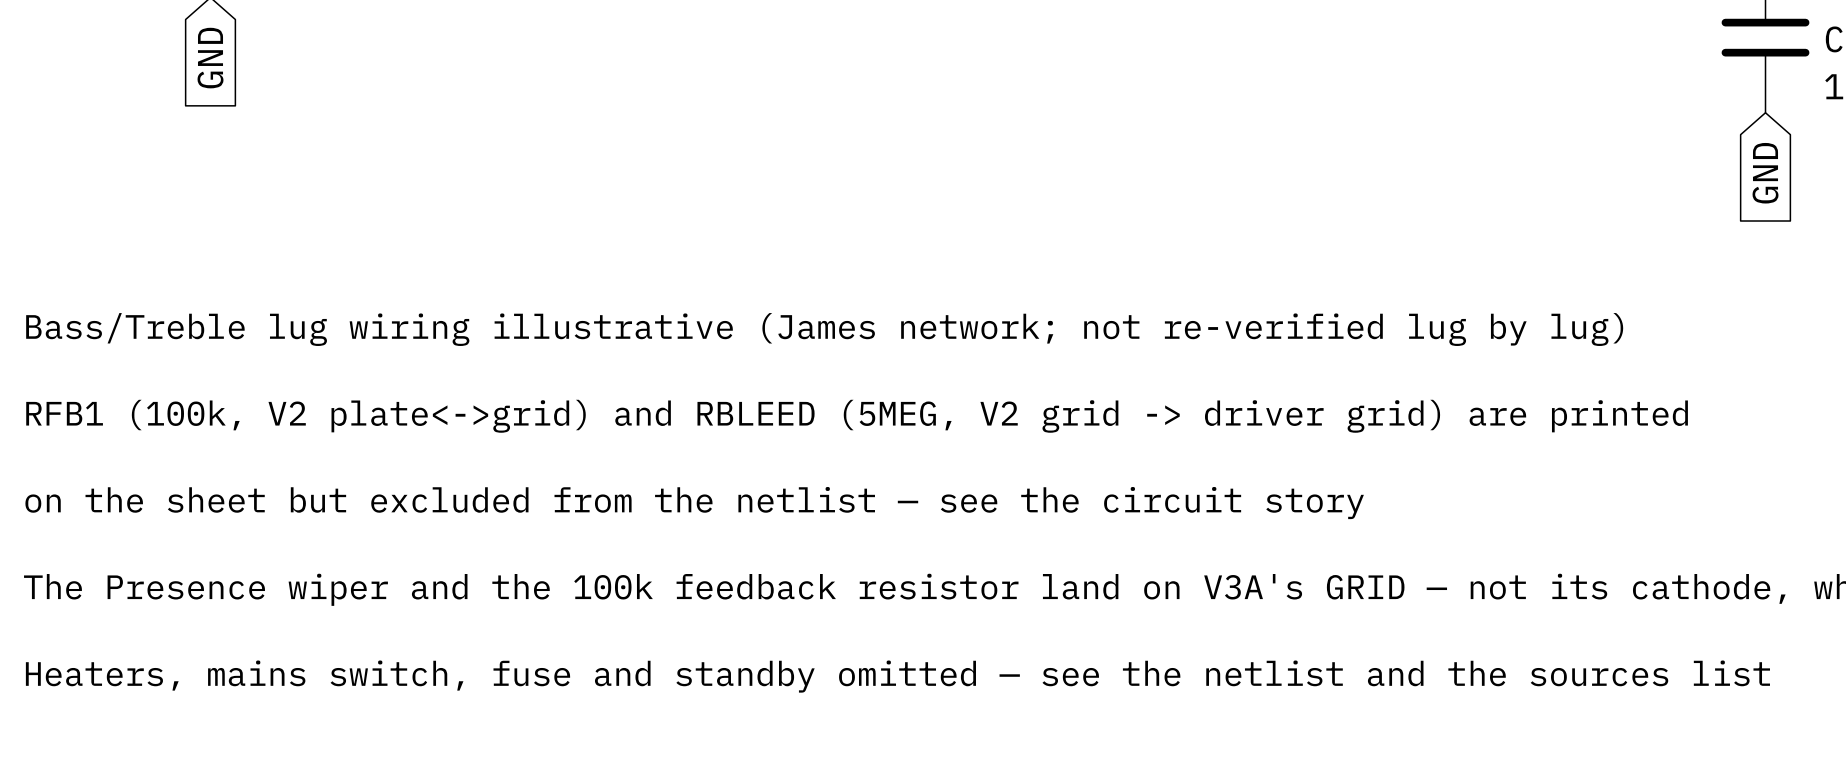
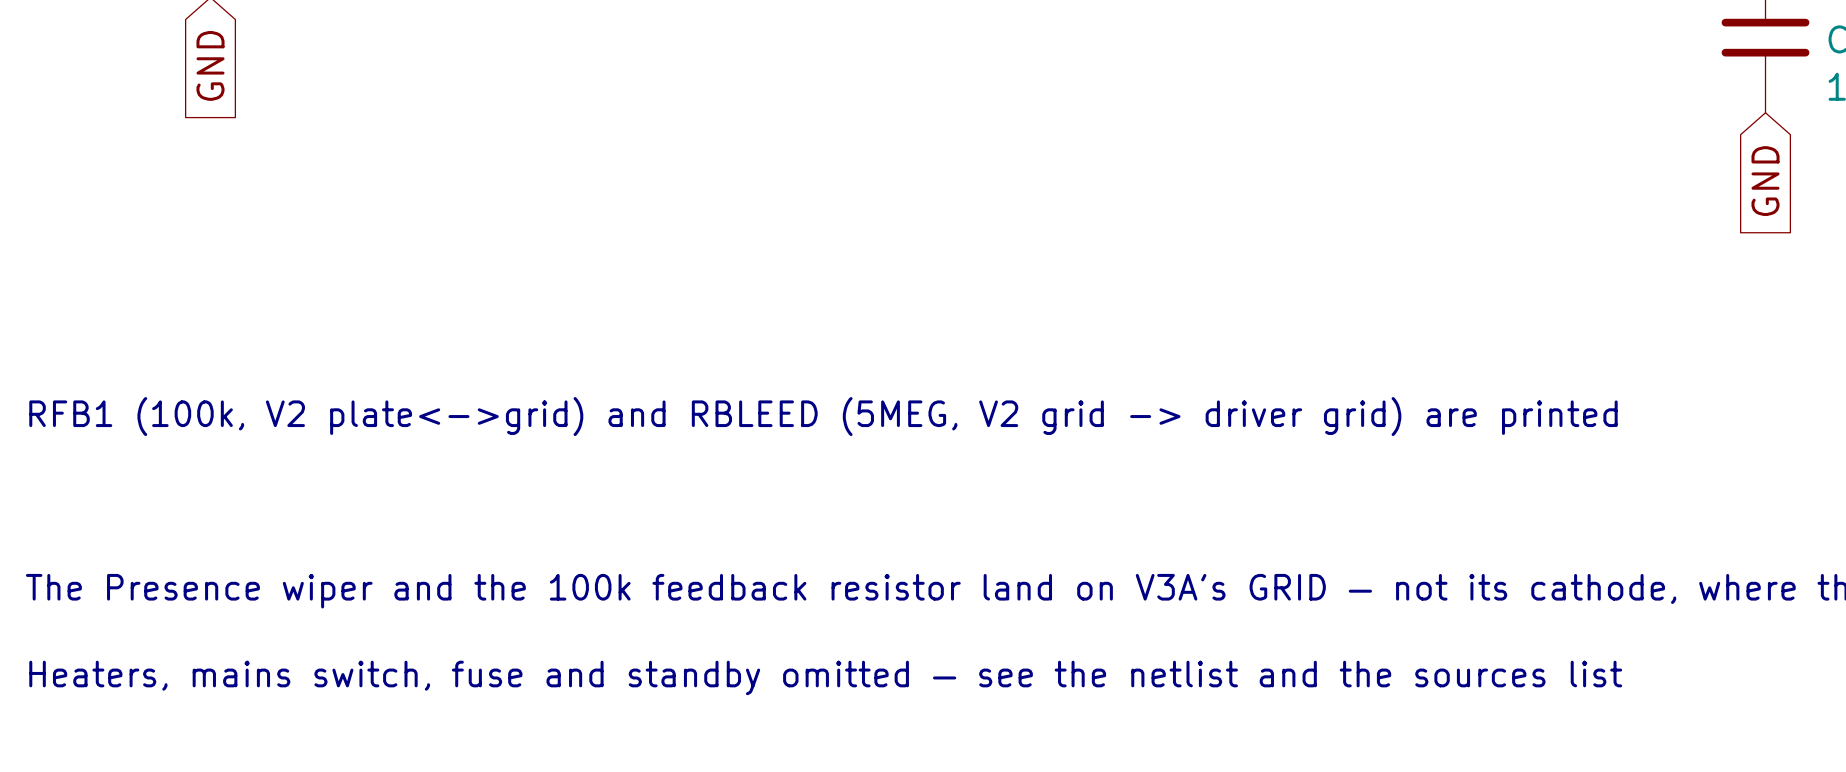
text: Bass/Treble lug wiring illustrative (James network; not re-verified lug by lug) (824, 329) -> none
text: on the sheet but excluded from the netlist — see the circuit story (694, 503) -> none

